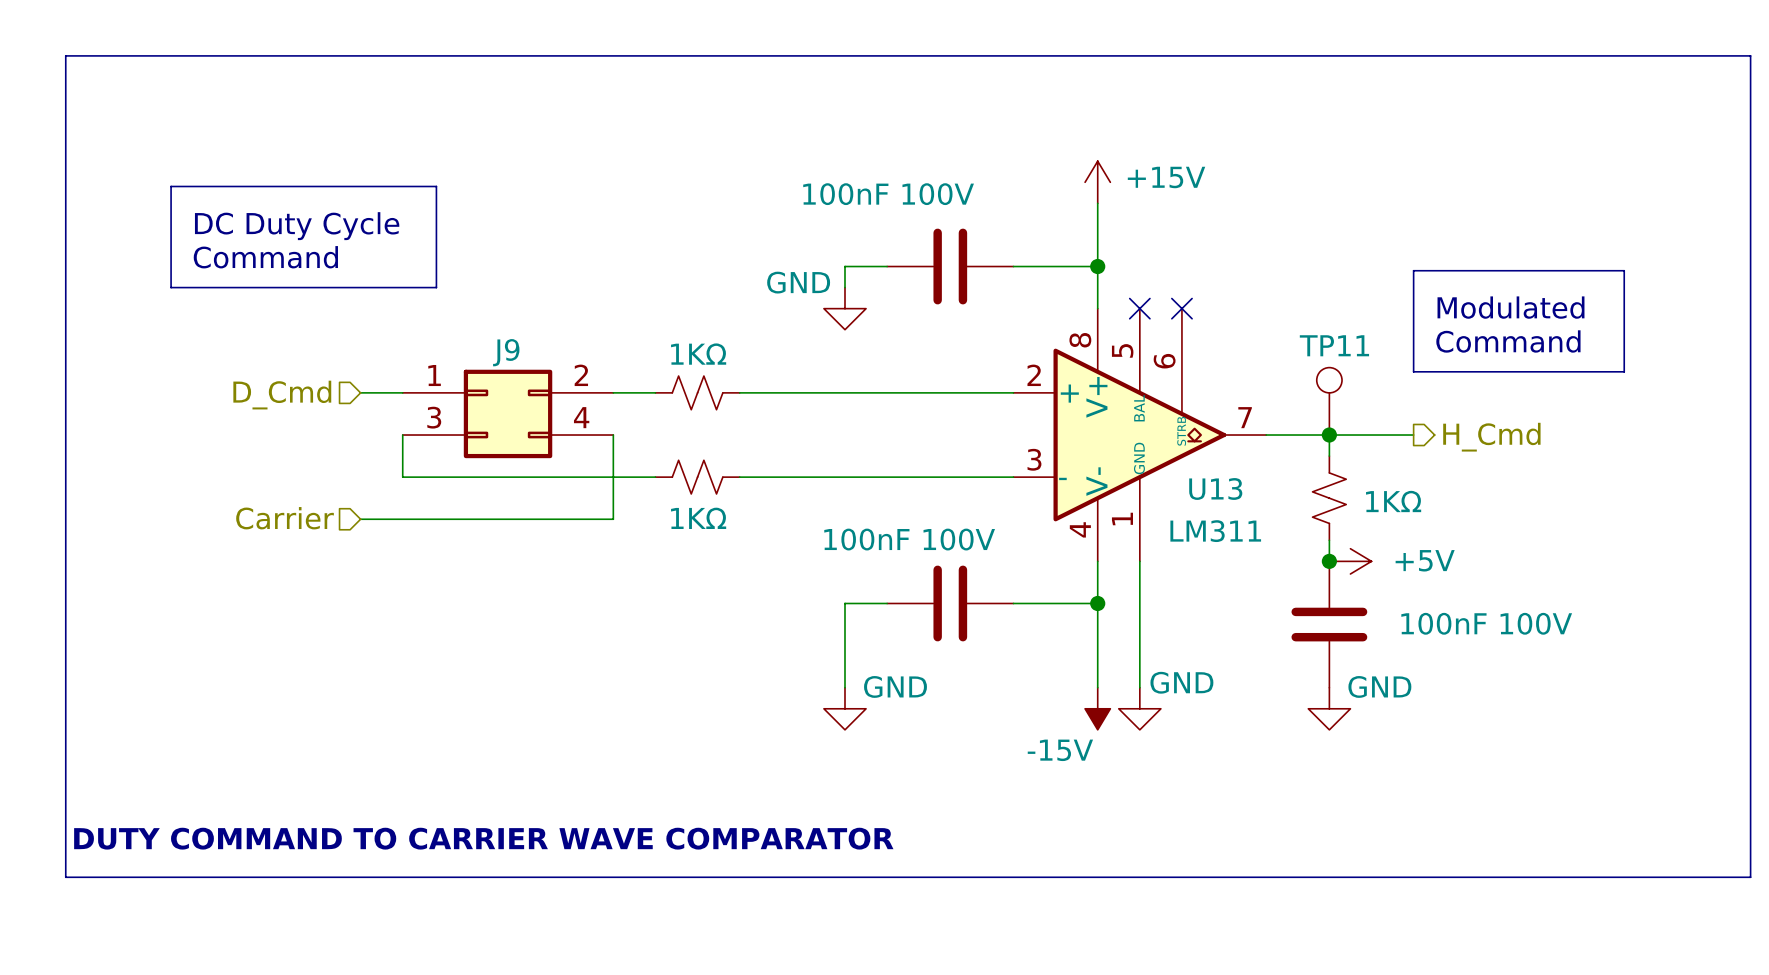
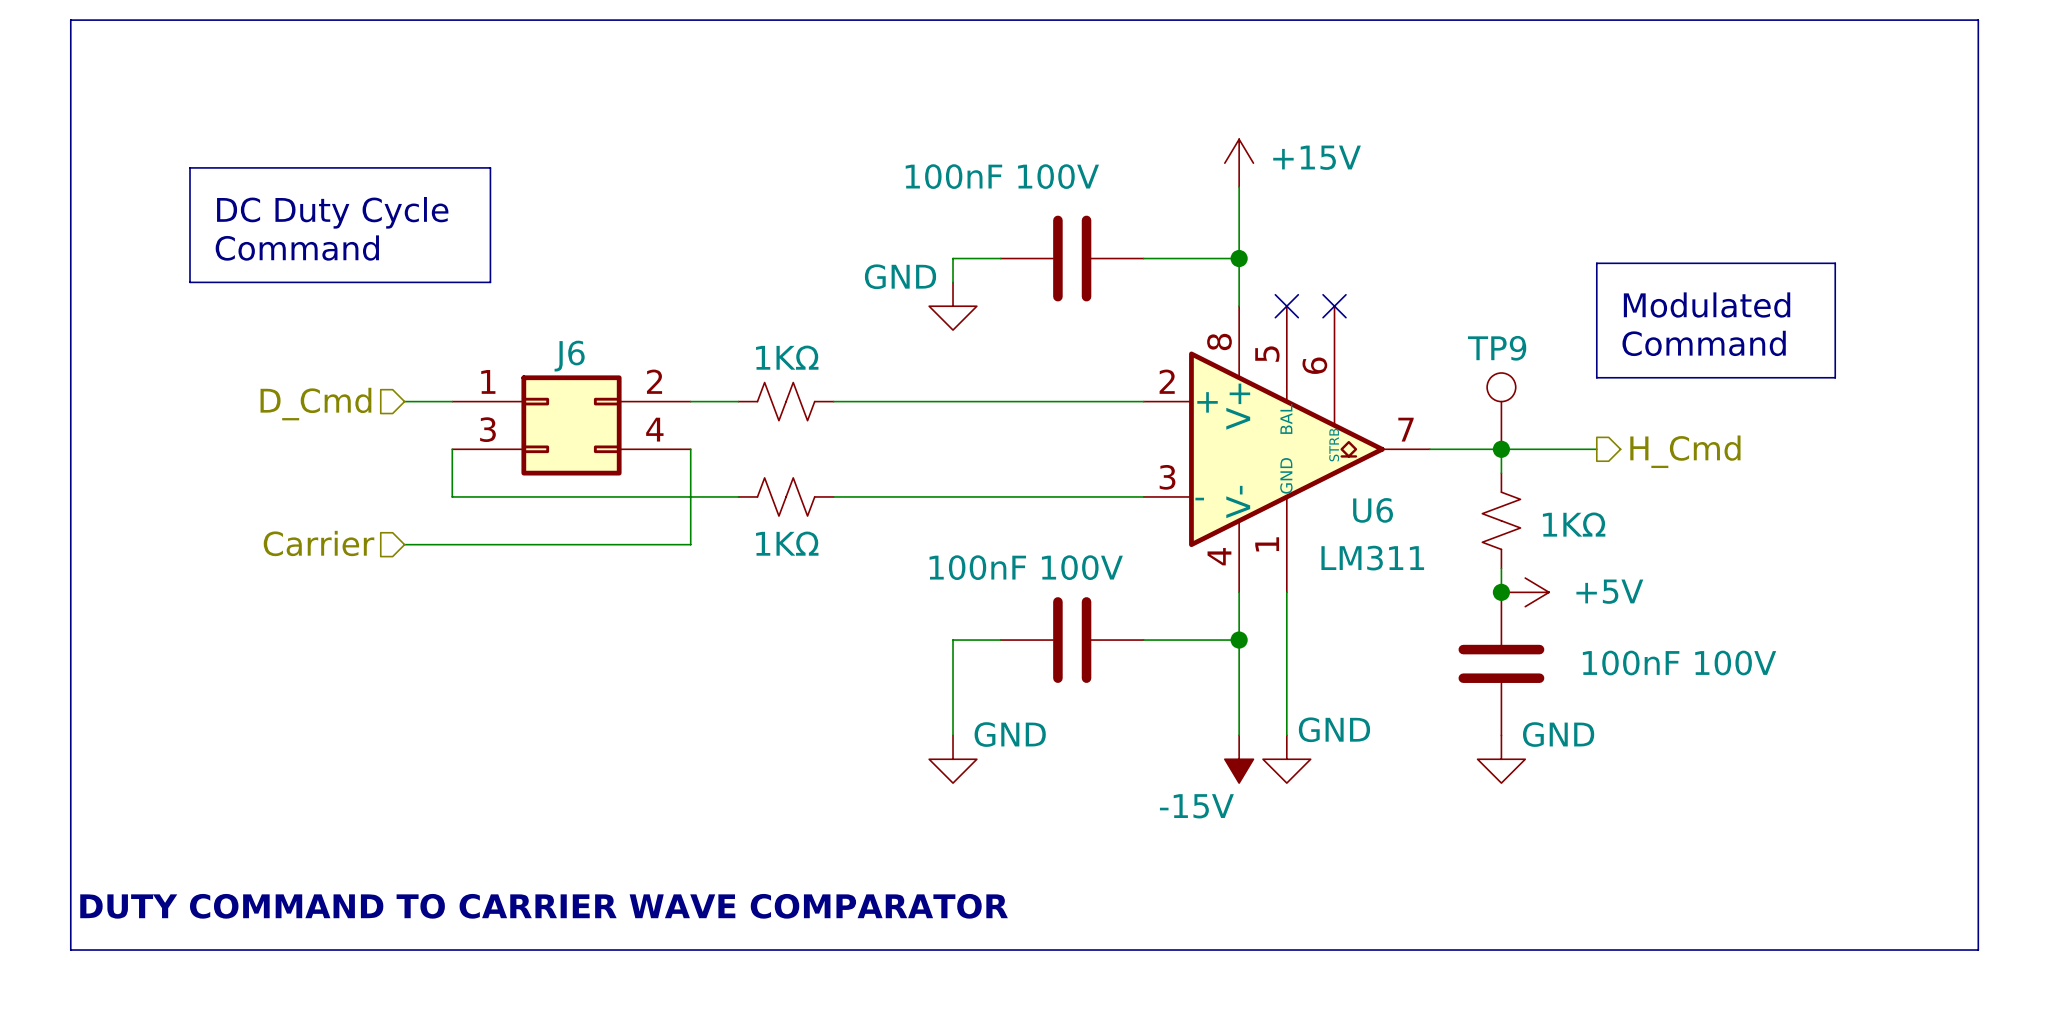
TP11 name: TP11 (1334, 345) -> TP9 (1497, 348)
J9 name: J9 (506, 352) -> J6 (569, 356)
U13 name: U13 (1215, 488) -> U6 (1373, 510)

